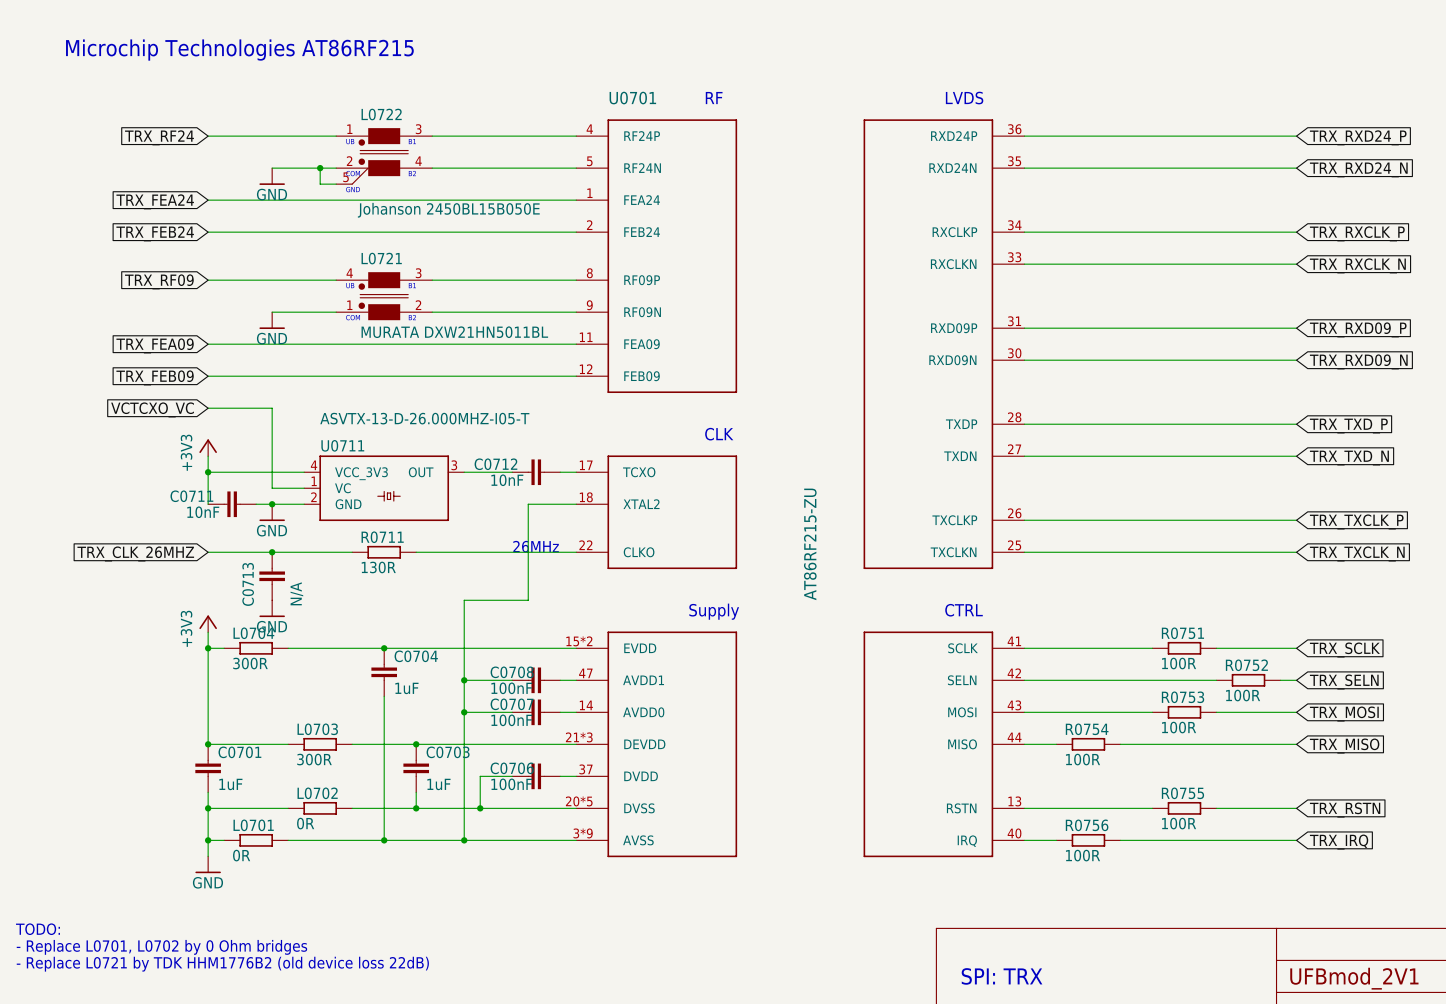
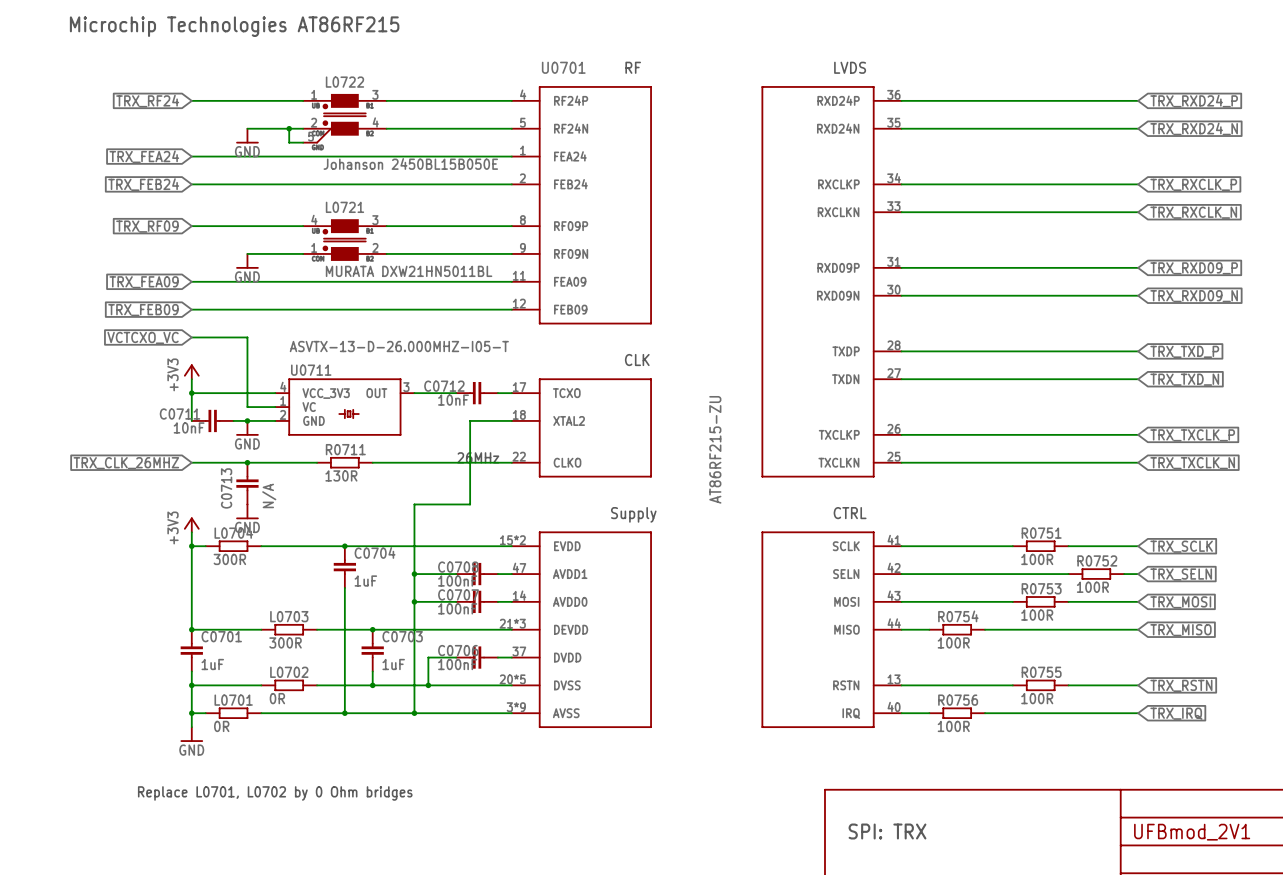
text: TODO: (38, 929) -> none
text: - Replace L0701, L0702 by 0 Ohm bridges (161, 947) -> Replace L0701, L0702 by 0 Ohm bridges (275, 793)
text: - Replace L0721 by TDK HHM1776B2 (old device loss 22dB) (222, 964) -> none

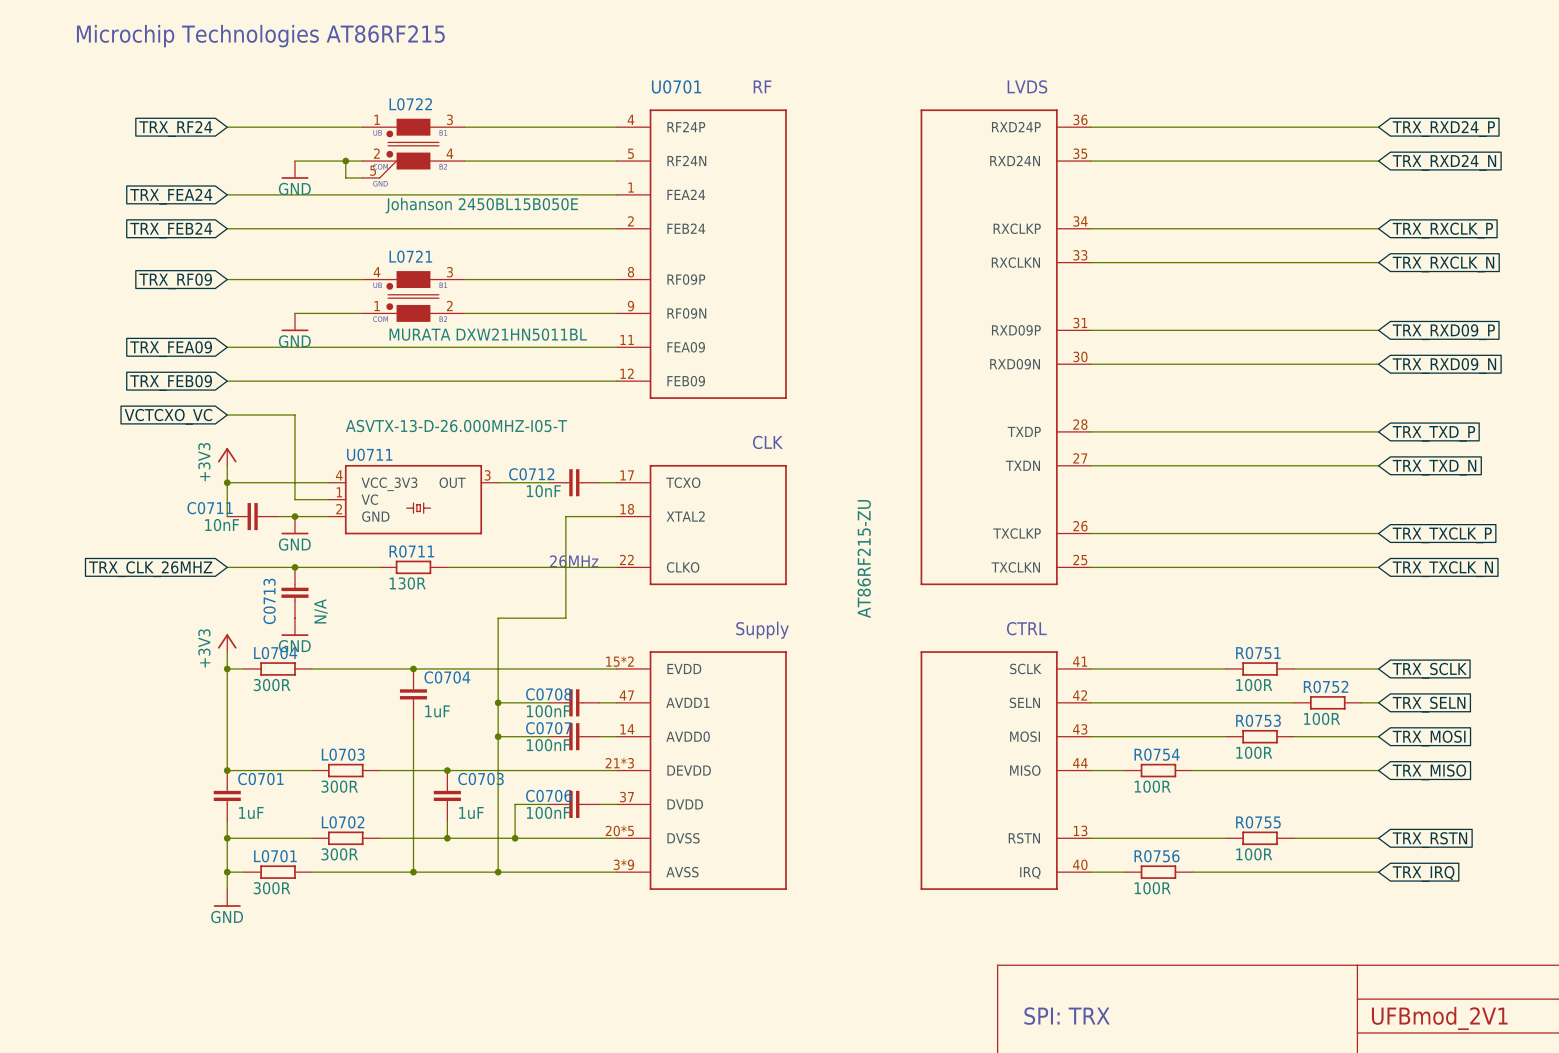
L0702 value: 0R (277, 698) -> 300R (339, 854)
L0701 value: 0R (221, 726) -> 300R (272, 888)
text: Replace L0701, L0702 by 0 Ohm bridges (275, 793) -> none

